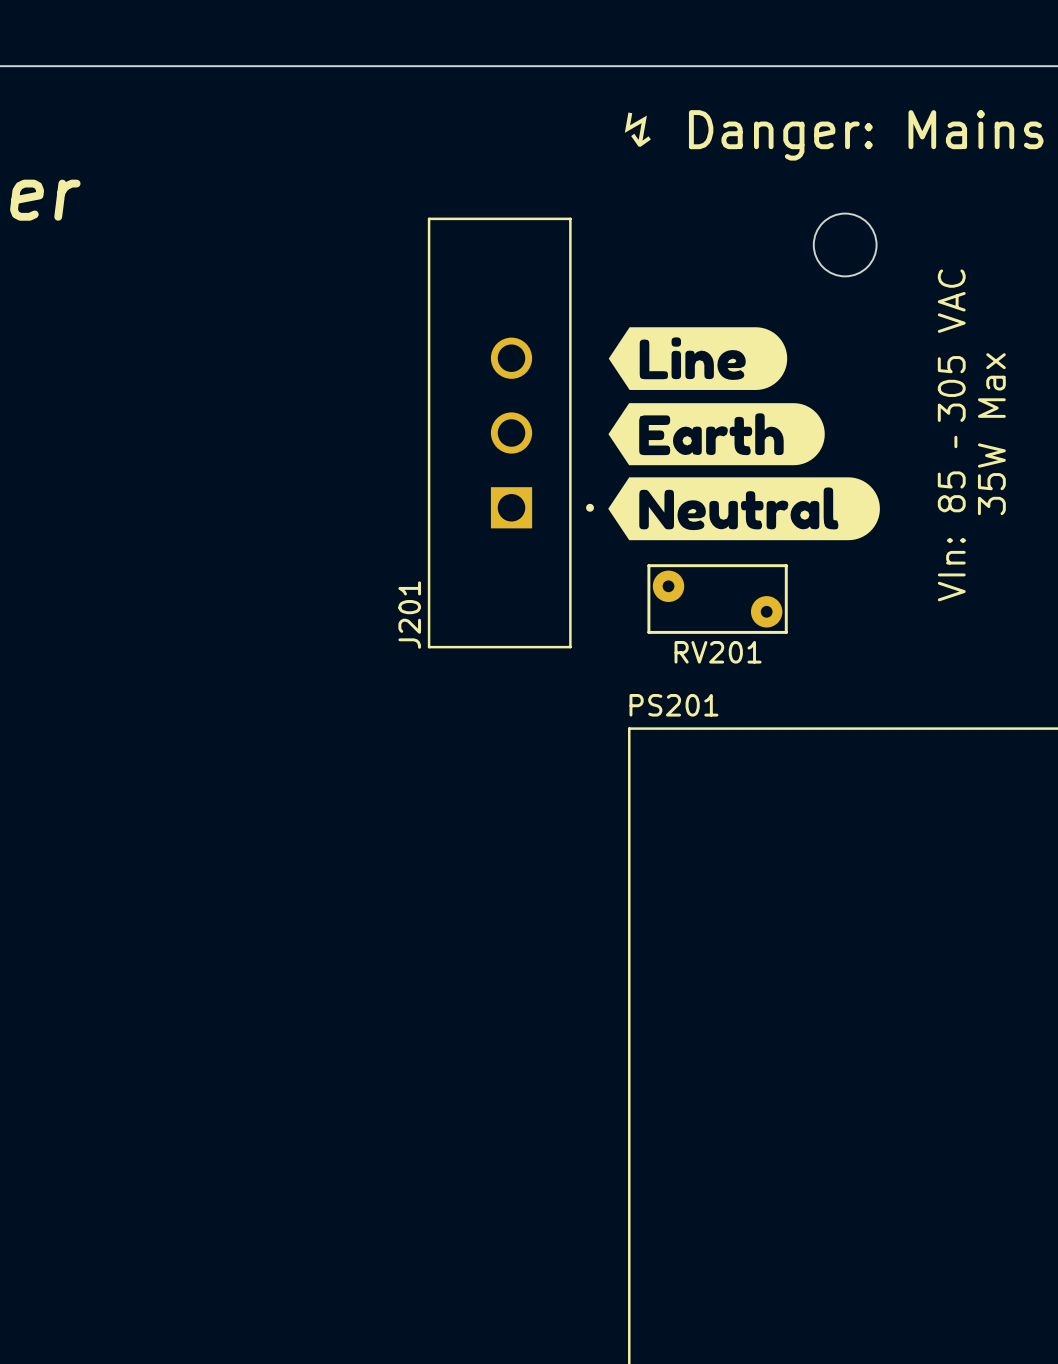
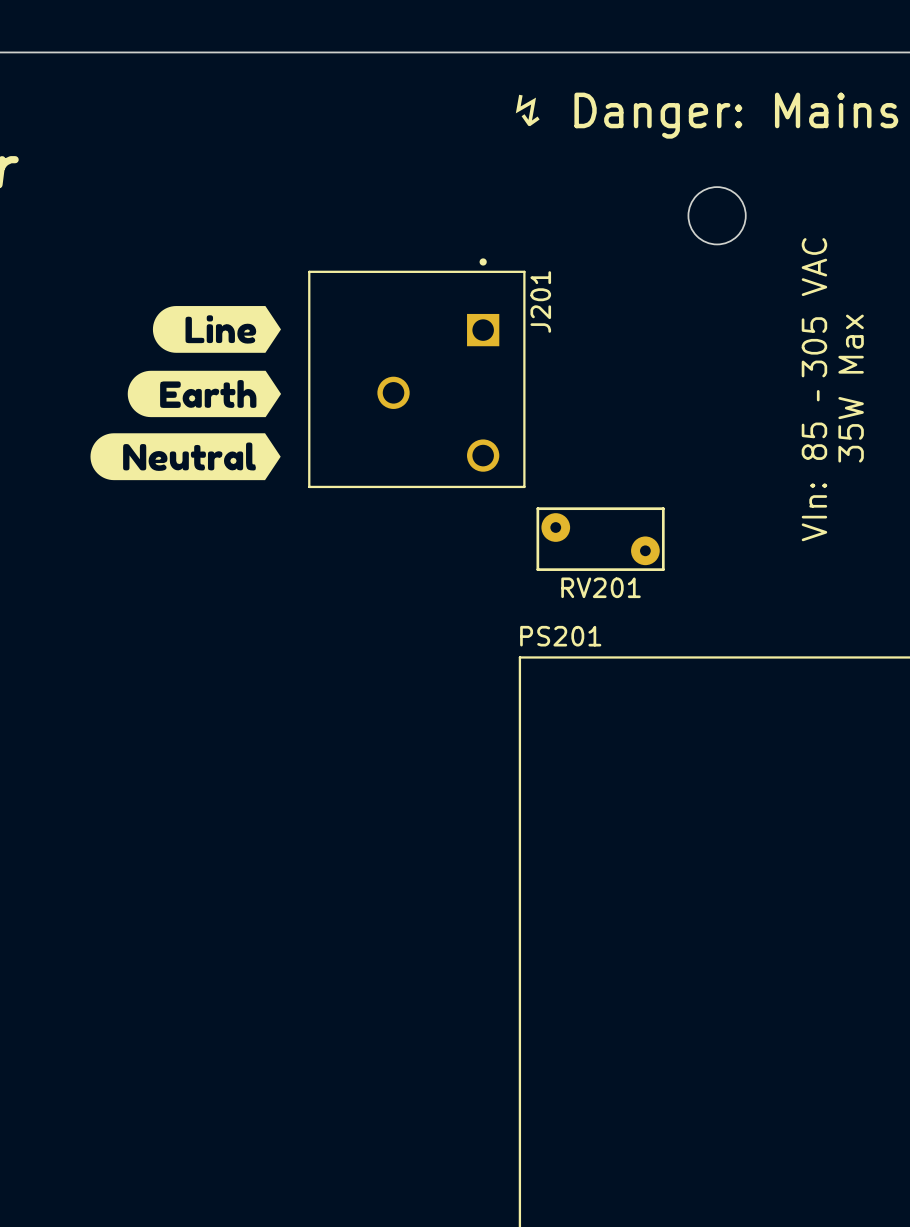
J201 footprint: [427, 217, 594, 649] -> [308, 258, 526, 489]
drawing: [608, 327, 880, 541] -> none
drawing: none -> [90, 306, 282, 481]
J201 name position: J201 (409, 615) -> J201 (540, 301)

